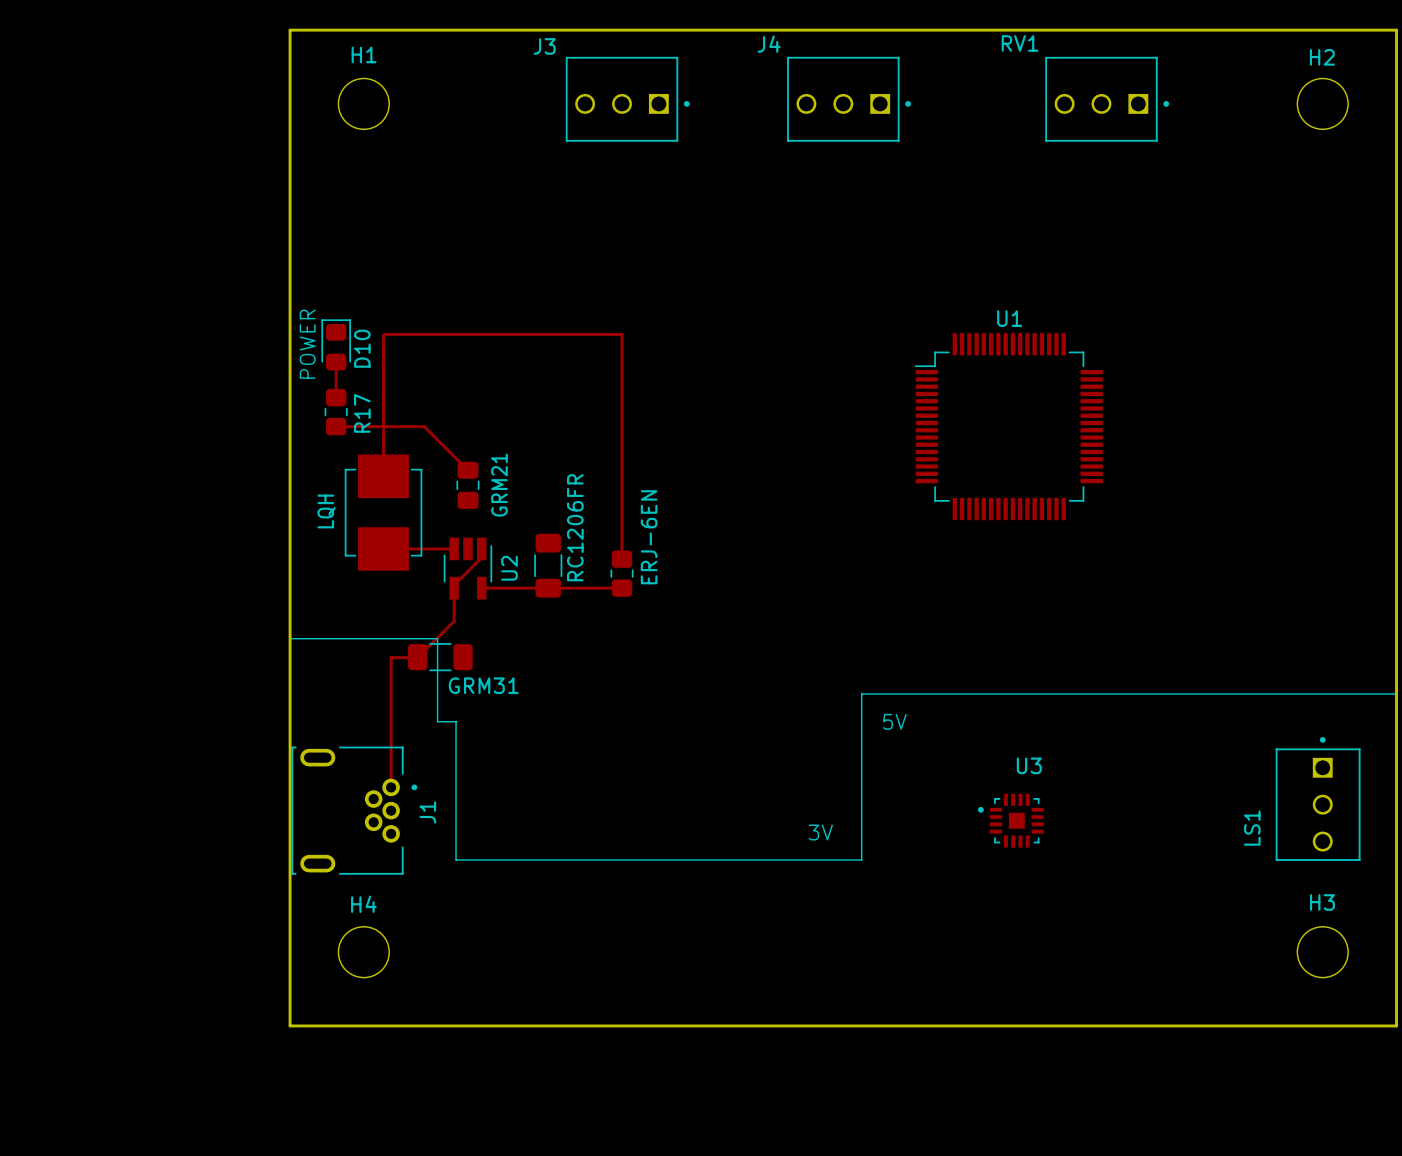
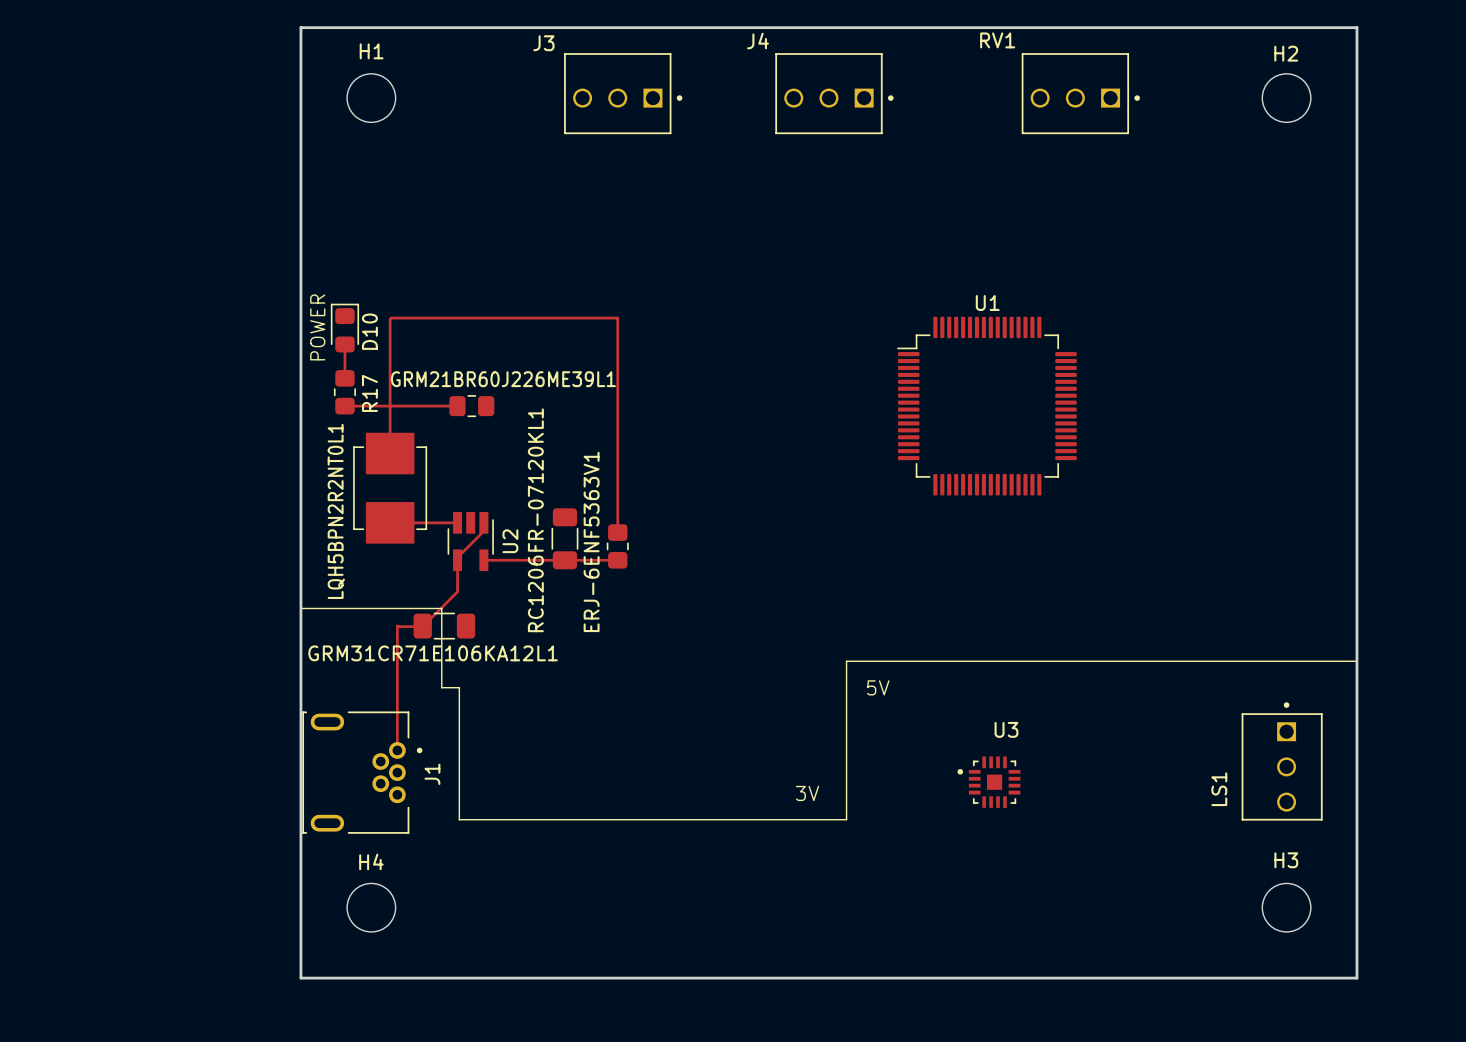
track: (424, 426) (467, 470) -> (429, 406) (457, 406)
GRM21BR60J226ME39L1: none -> (471, 406)
GRM21: (467, 485) -> none
LQH name: LQH (326, 511) -> LQH5BPN2R2NT0L1 (336, 511)
ERJ-6EN name: ERJ-6EN (649, 537) -> ERJ-6ENF5363V1 (591, 541)
RC1206FR: (548, 565) -> none
RC1206FR-07120KL1: none -> (564, 538)
GRM31 name: GRM31 (483, 685) -> GRM31CR71E106KA12L1 (433, 653)

